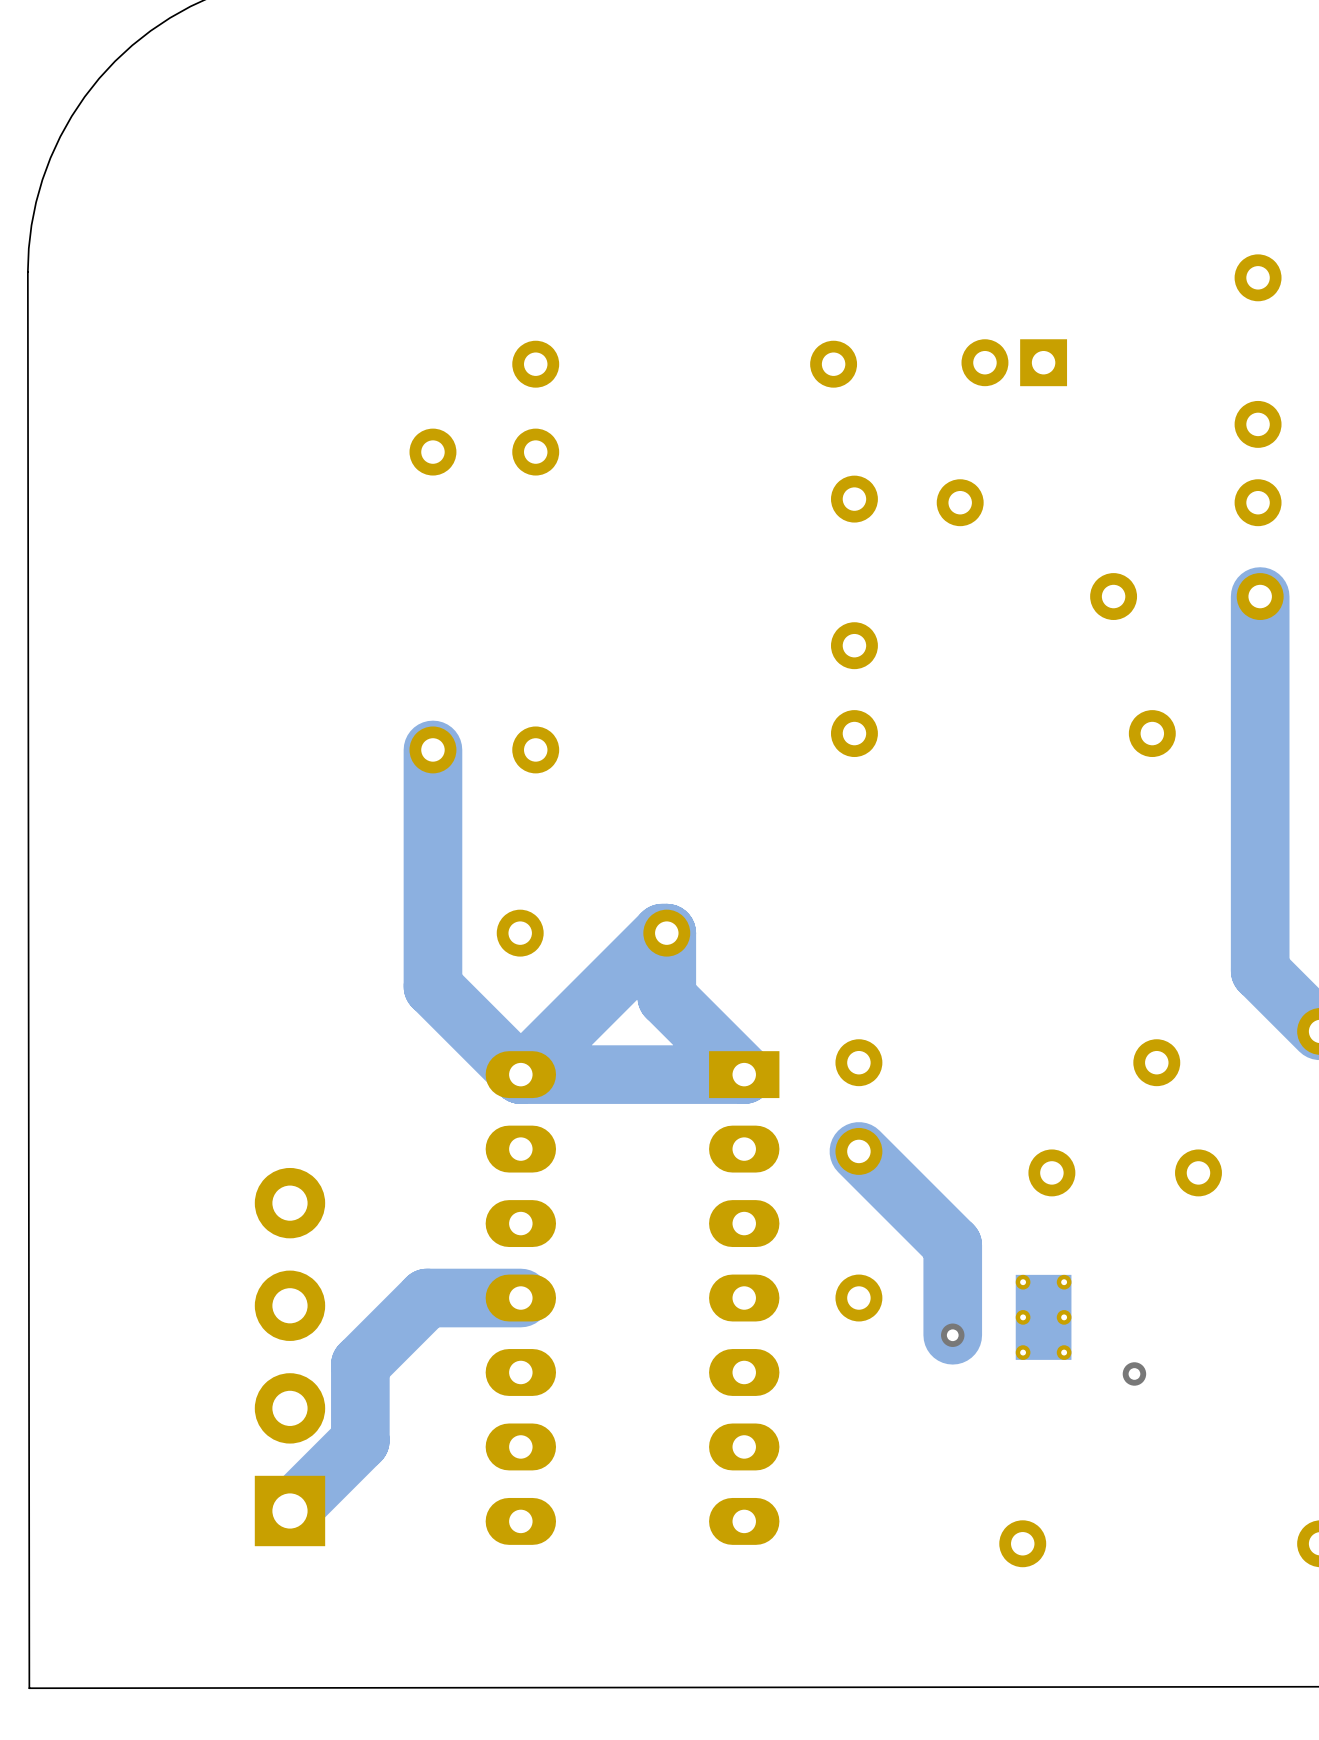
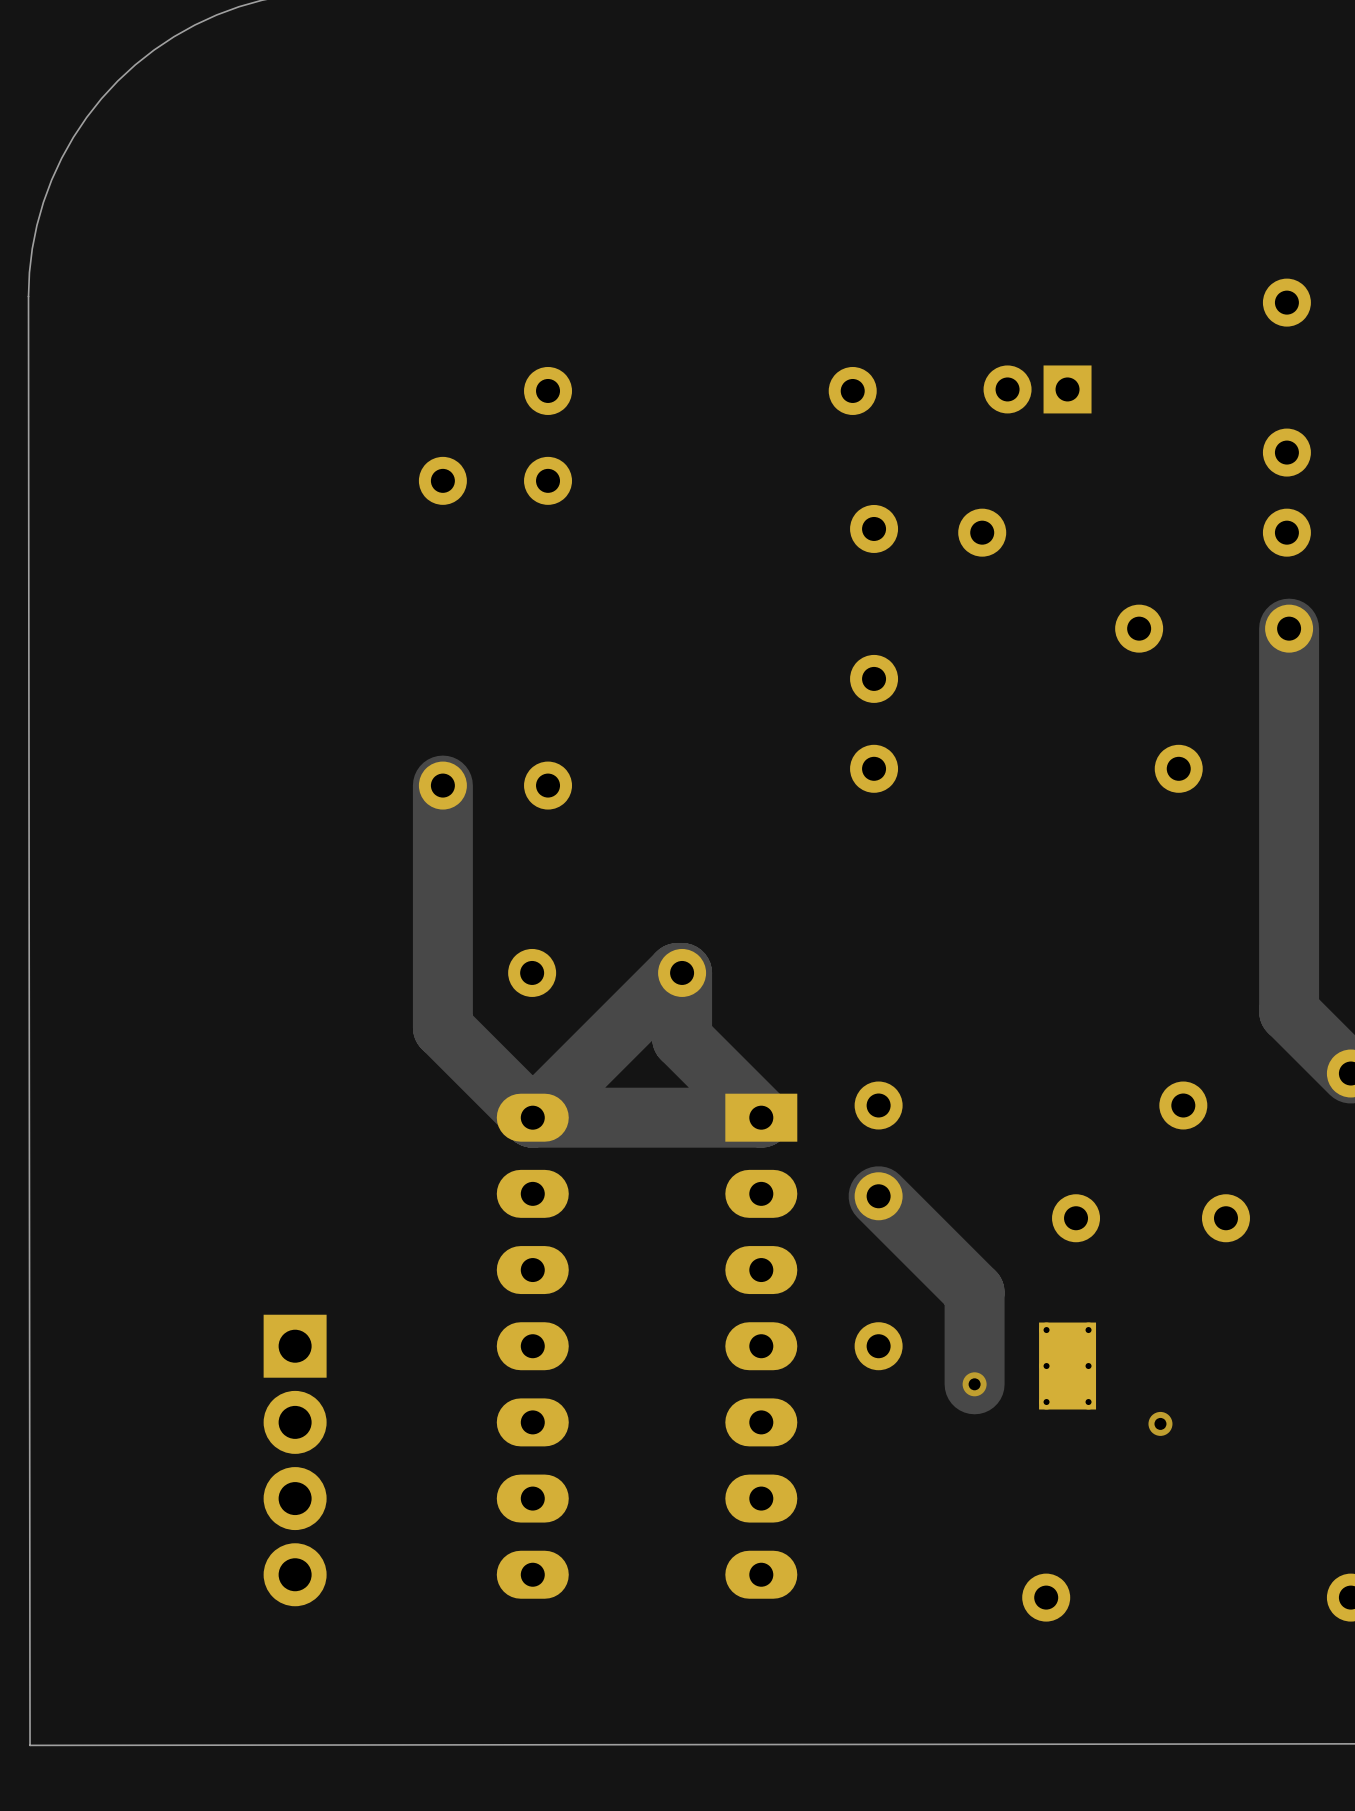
track: (520, 1298) (427, 1298) (360, 1364) (360, 1440) (289, 1510) -> none
part: (289, 1357) -> none
part: none -> (295, 1460)

